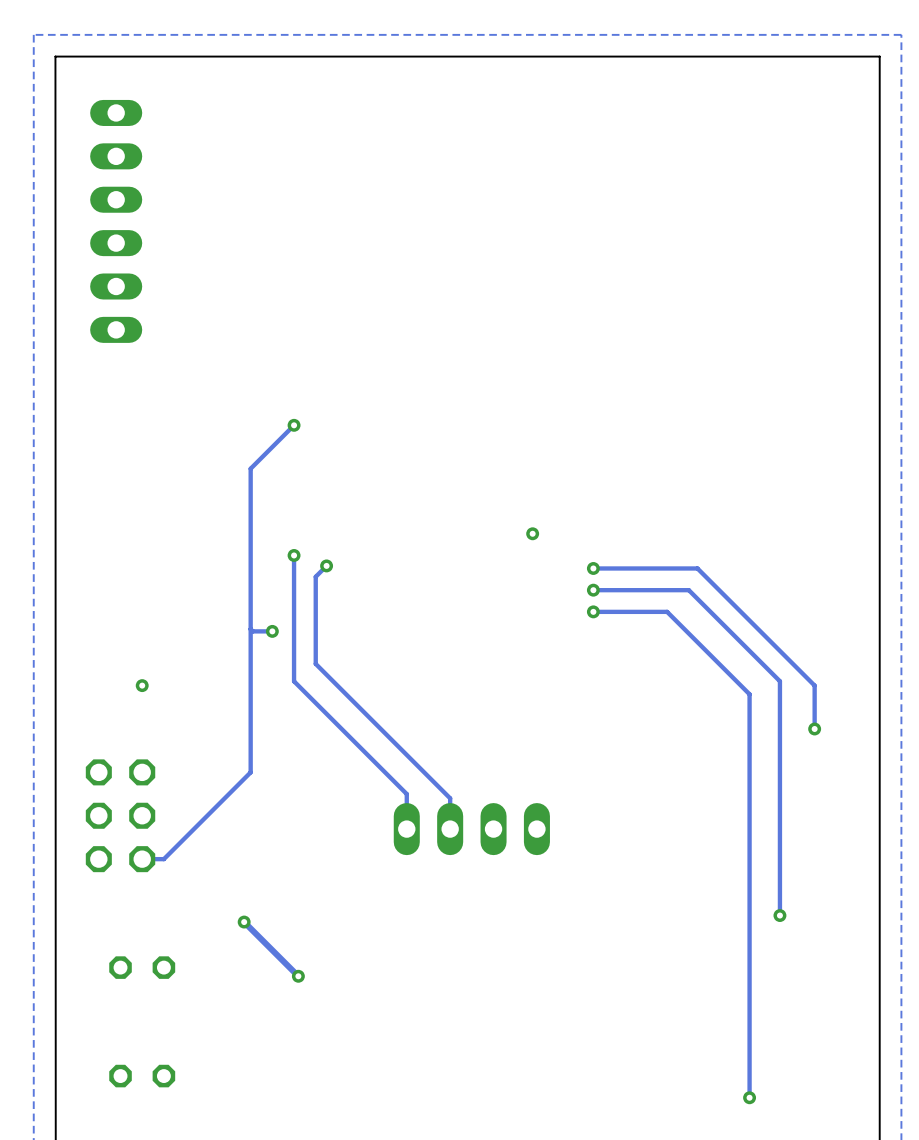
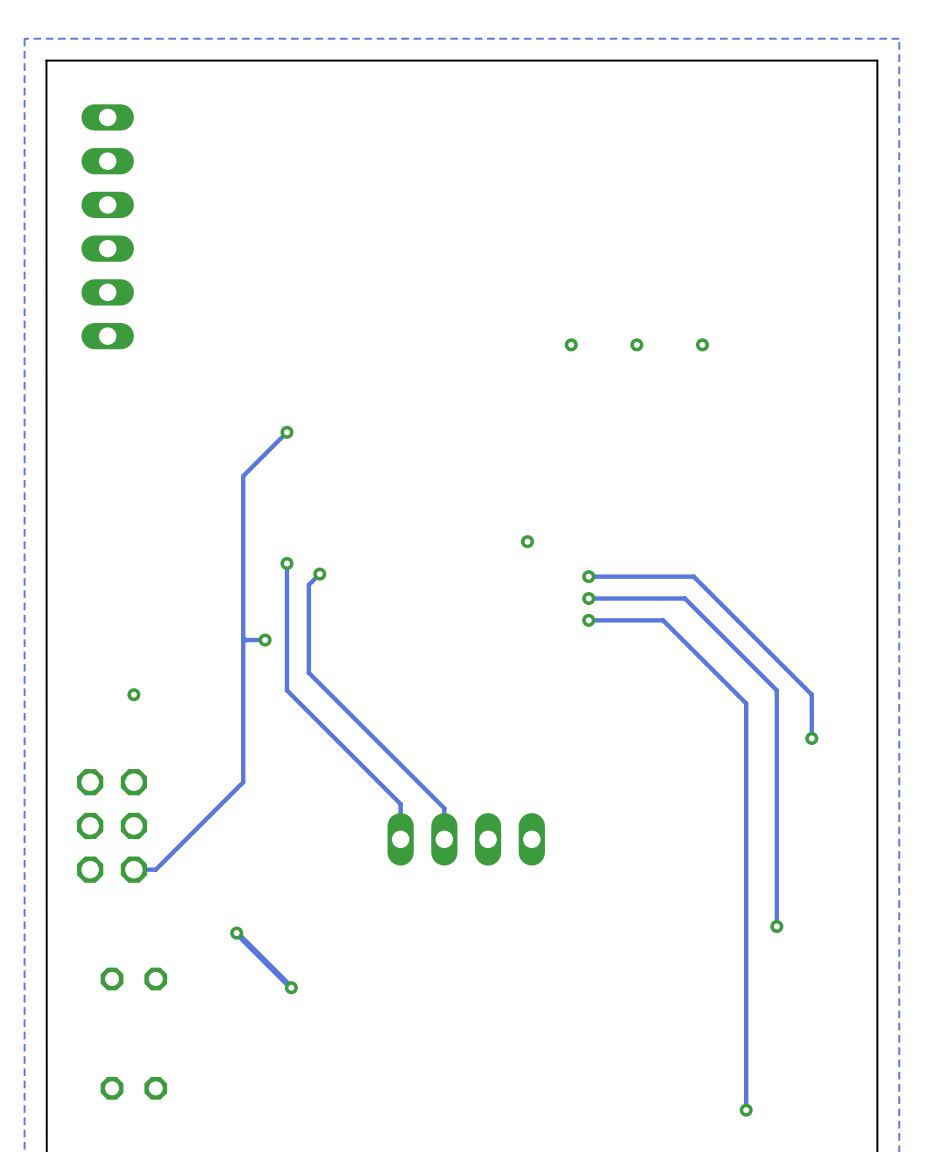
via: none -> (571, 344)
via: none -> (636, 344)
via: none -> (702, 344)

